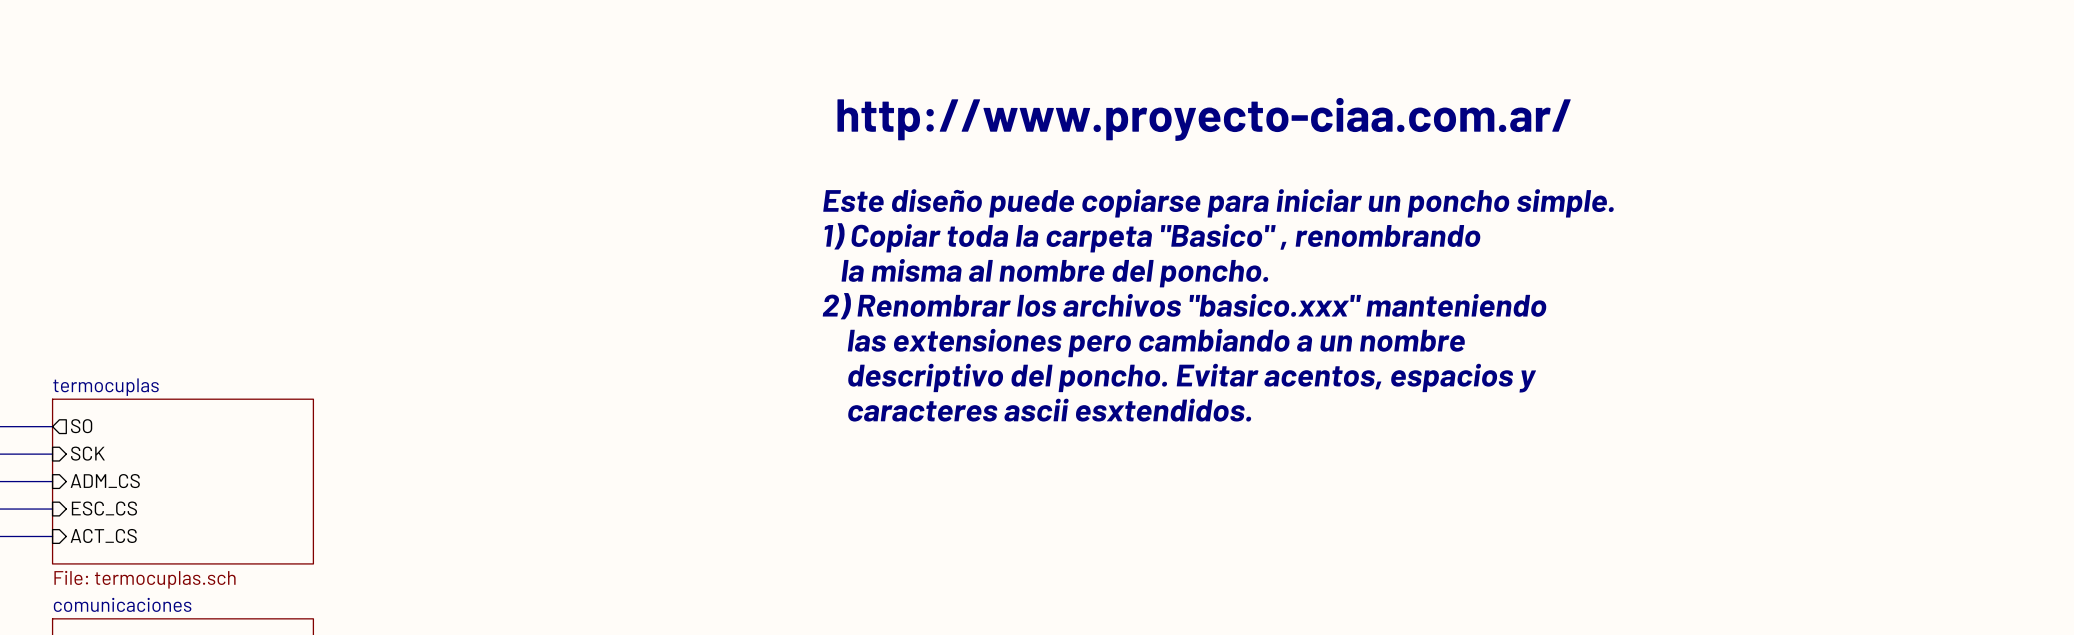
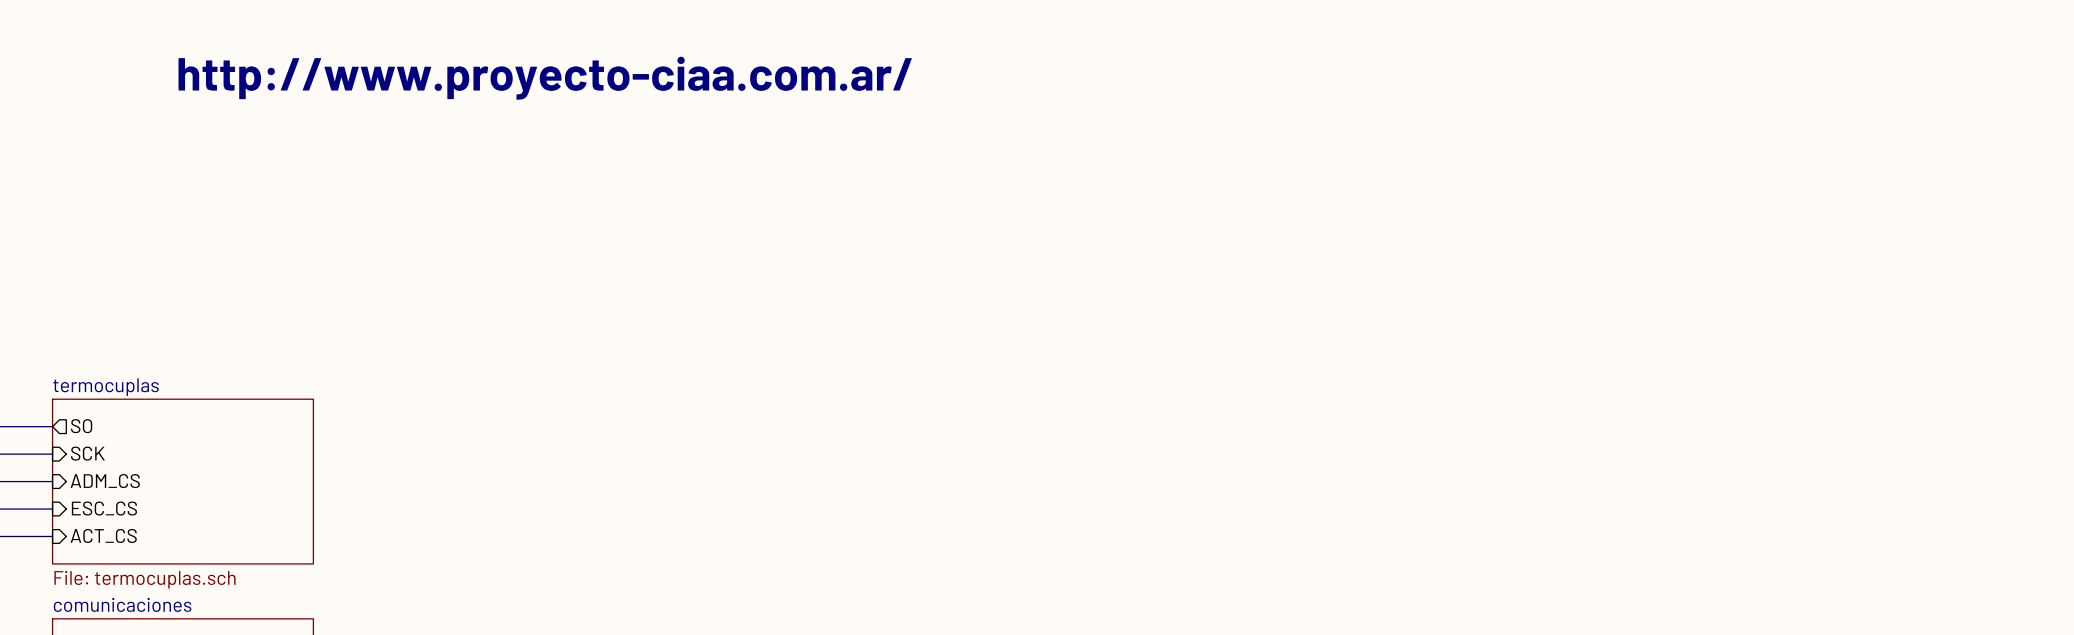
text: none -> http://www.proyecto-ciaa.com.ar/ (545, 78)
text: http://www.proyecto-ciaa.com.ar/ (1204, 119) -> none
text: Este diseño puede copiarse para iniciar un poncho simple. (1218, 203) -> none
text: 1) Copiar toda la carpeta "Basico" , renombrando (1152, 237) -> none
text: la misma al nombre del poncho. (1054, 273) -> none
text: 2) Renombrar los archivos "basico.xxx" manteniendo (1184, 306) -> none
text: las extensiones pero cambiando a un nombre (1156, 343) -> none
text: descriptivo del poncho. Evitar acentos, espacios y (1192, 378) -> none
text: caracteres ascii esxtendidos. (1049, 410) -> none

